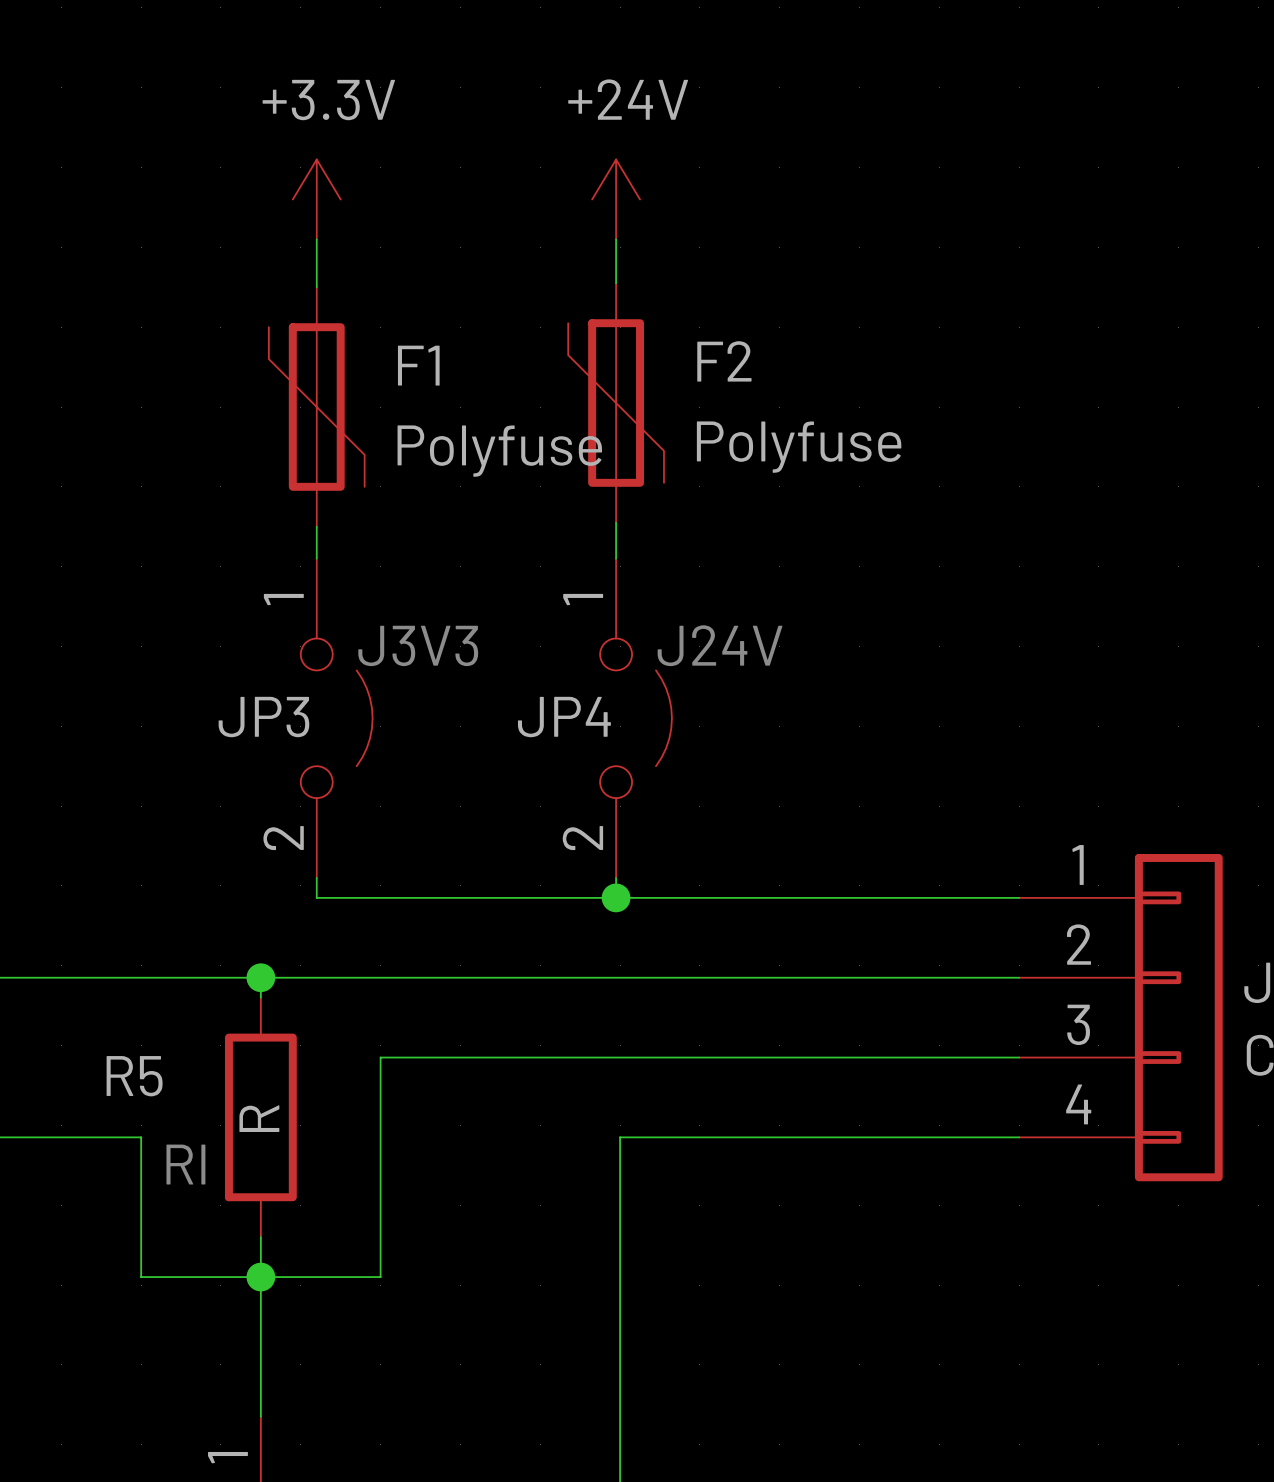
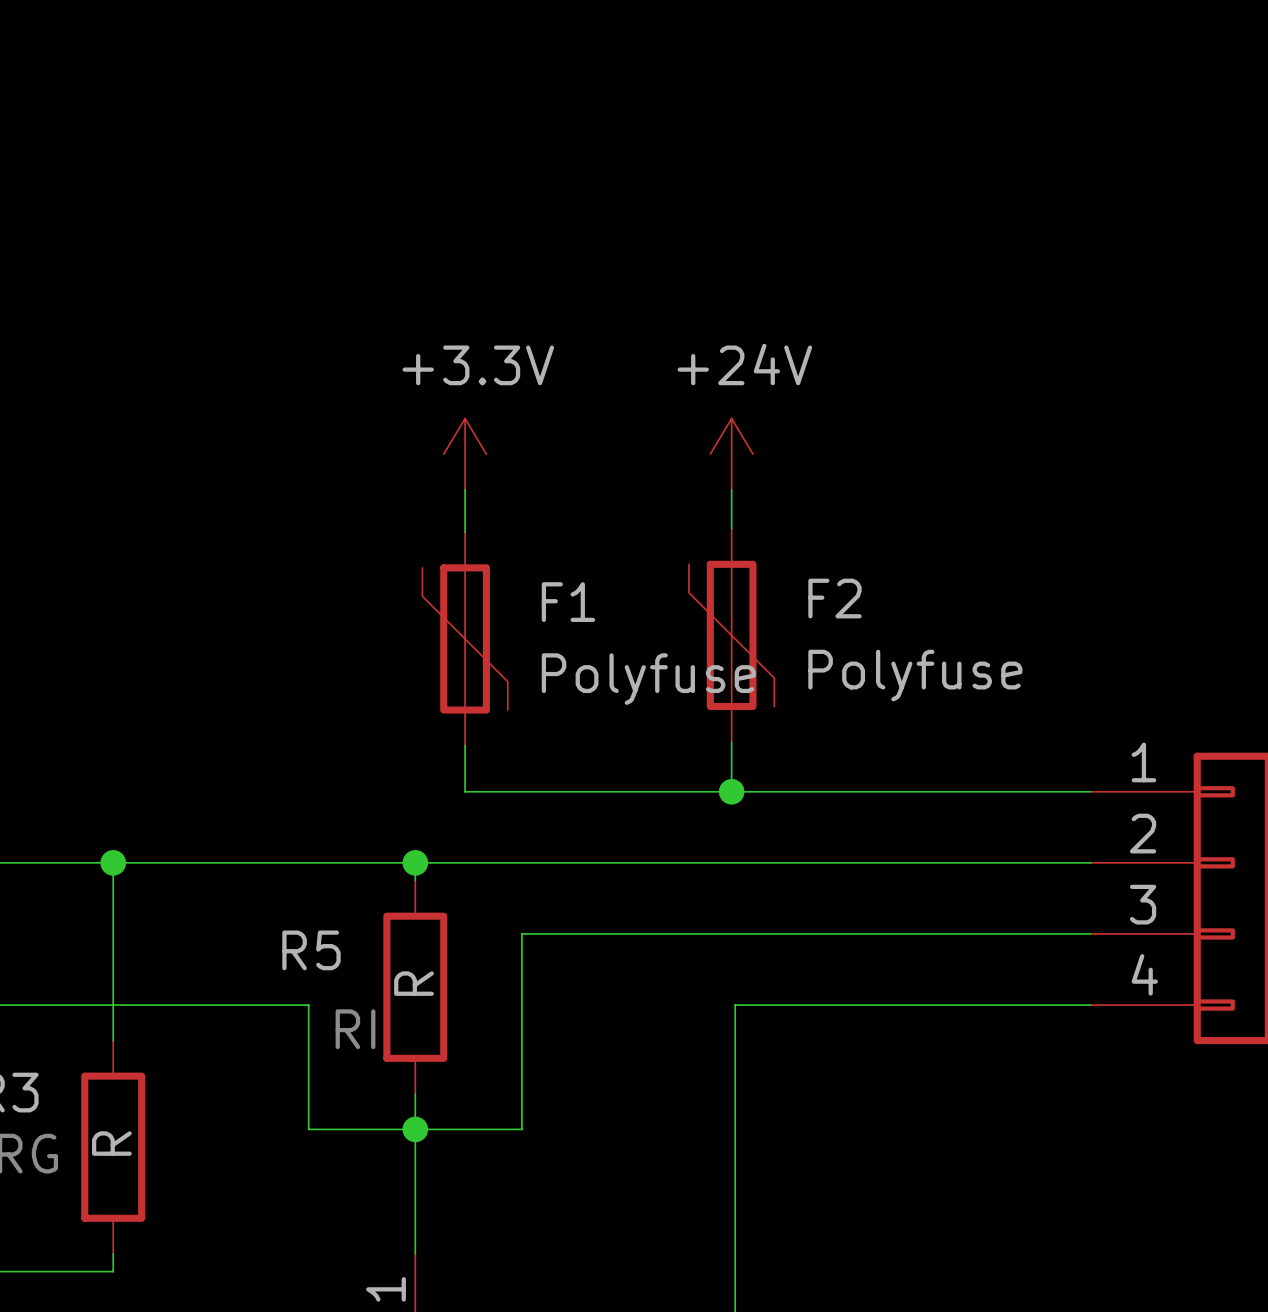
power symbol position: +3.3V (316, 199) -> +3.3V (465, 454)
power symbol position: +24V (616, 199) -> +24V (731, 454)
wire: (316, 239) (316, 287) -> none
wire: (616, 239) (616, 283) -> none
F2 position: (616, 403) -> (731, 635)
F1 position: (316, 407) -> (465, 638)
text: J3V3 (418, 645) -> none
text: J24V (720, 645) -> none
JP3: (336, 718) -> none
JP4: (636, 718) -> none

